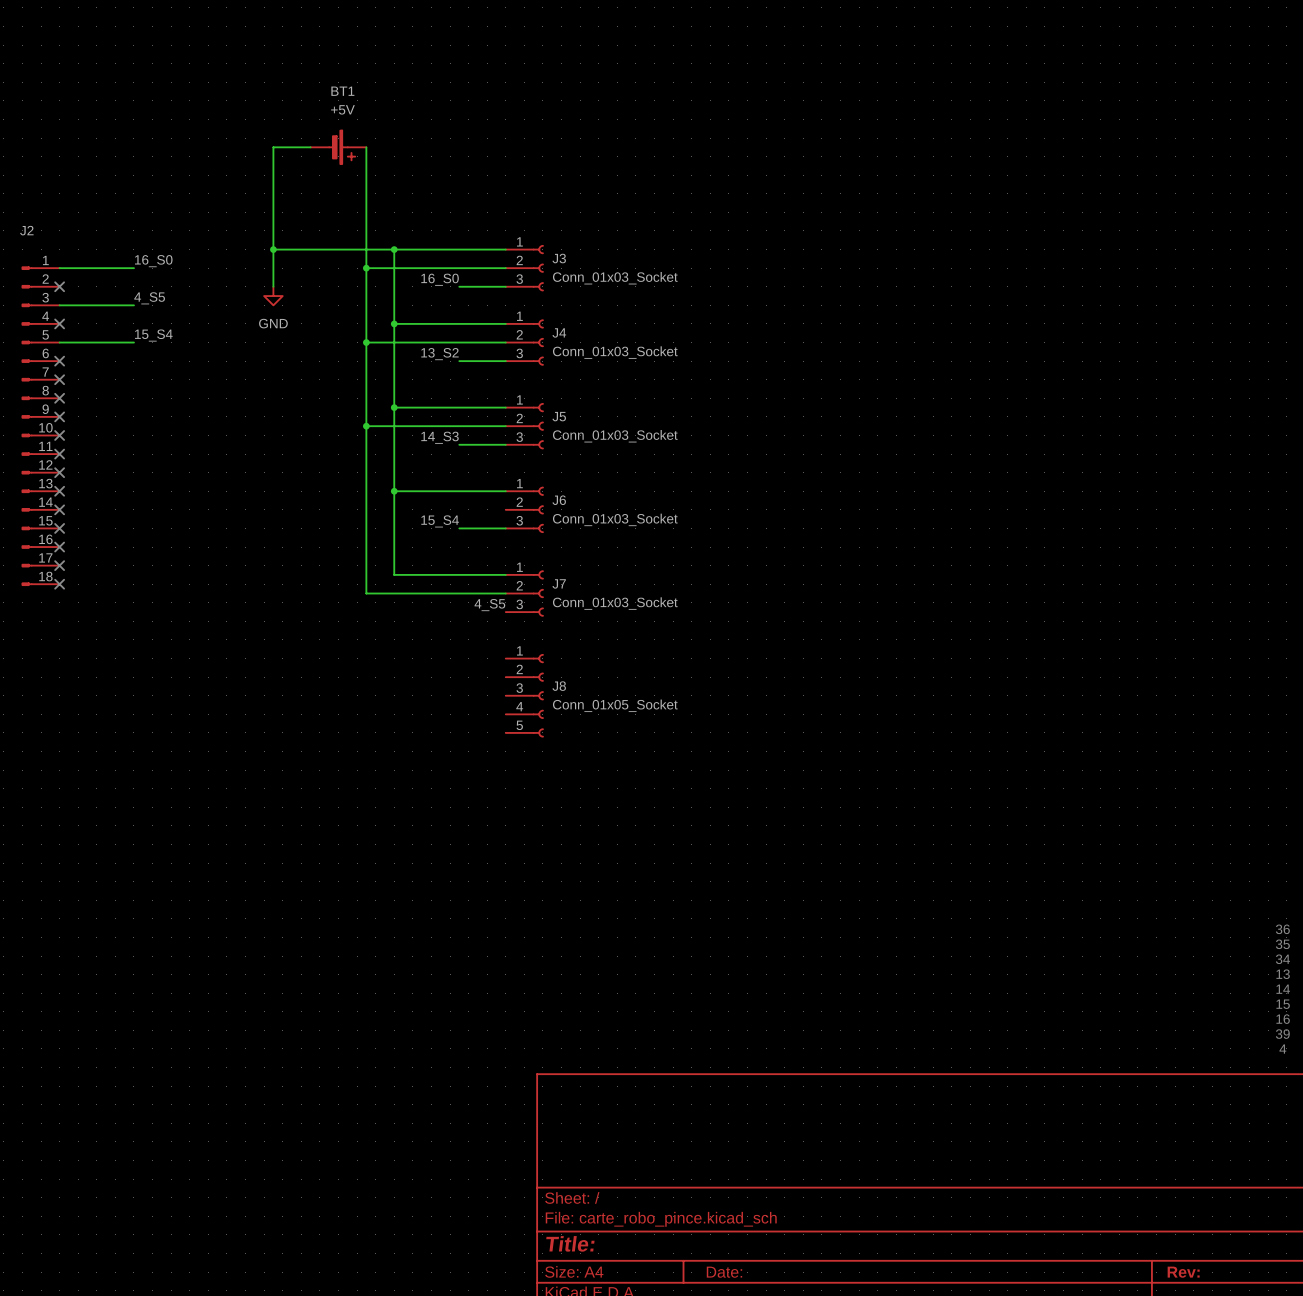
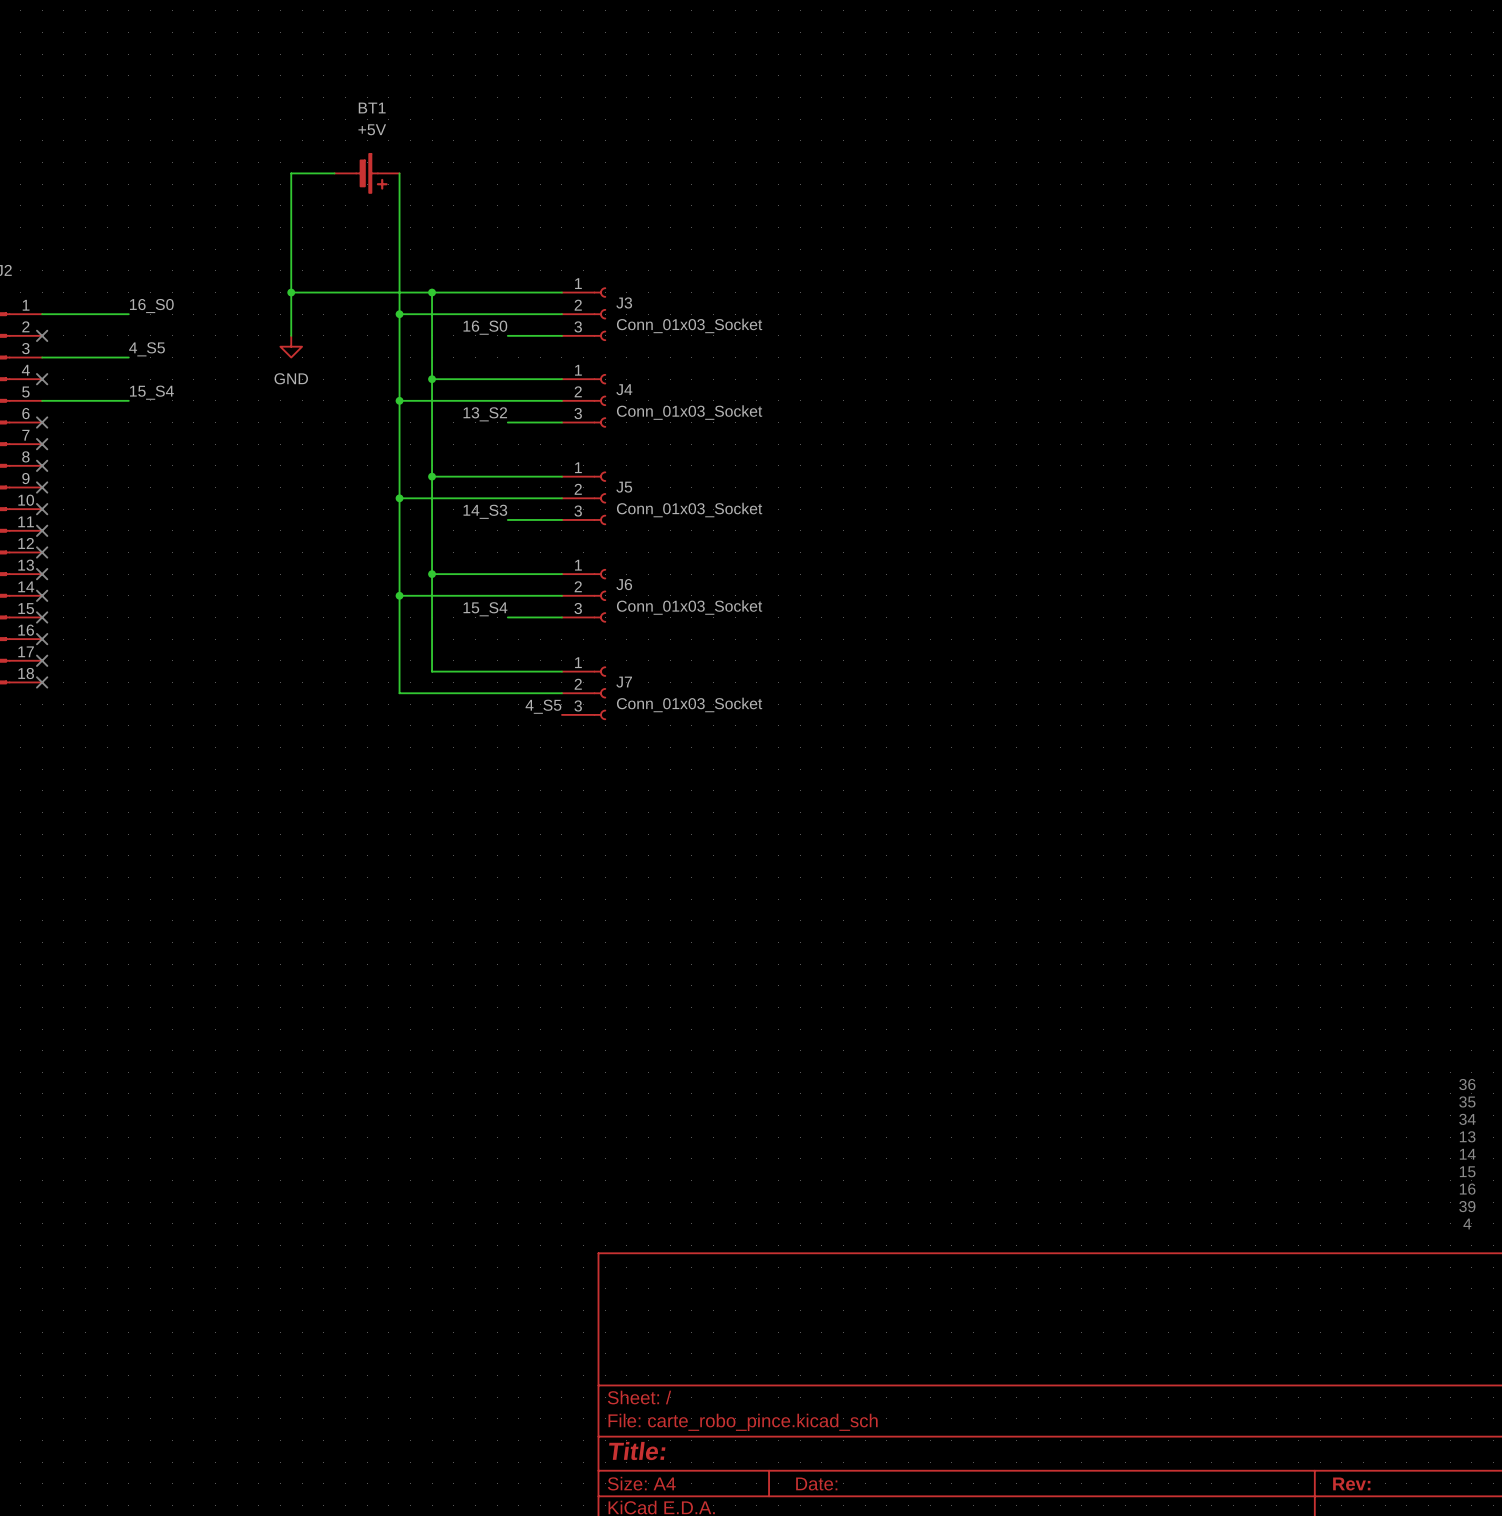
wire: none -> (399, 595) (561, 595)
junction: none -> (399, 595)
J8: Conn_01x05_Socket (524, 695) -> none

